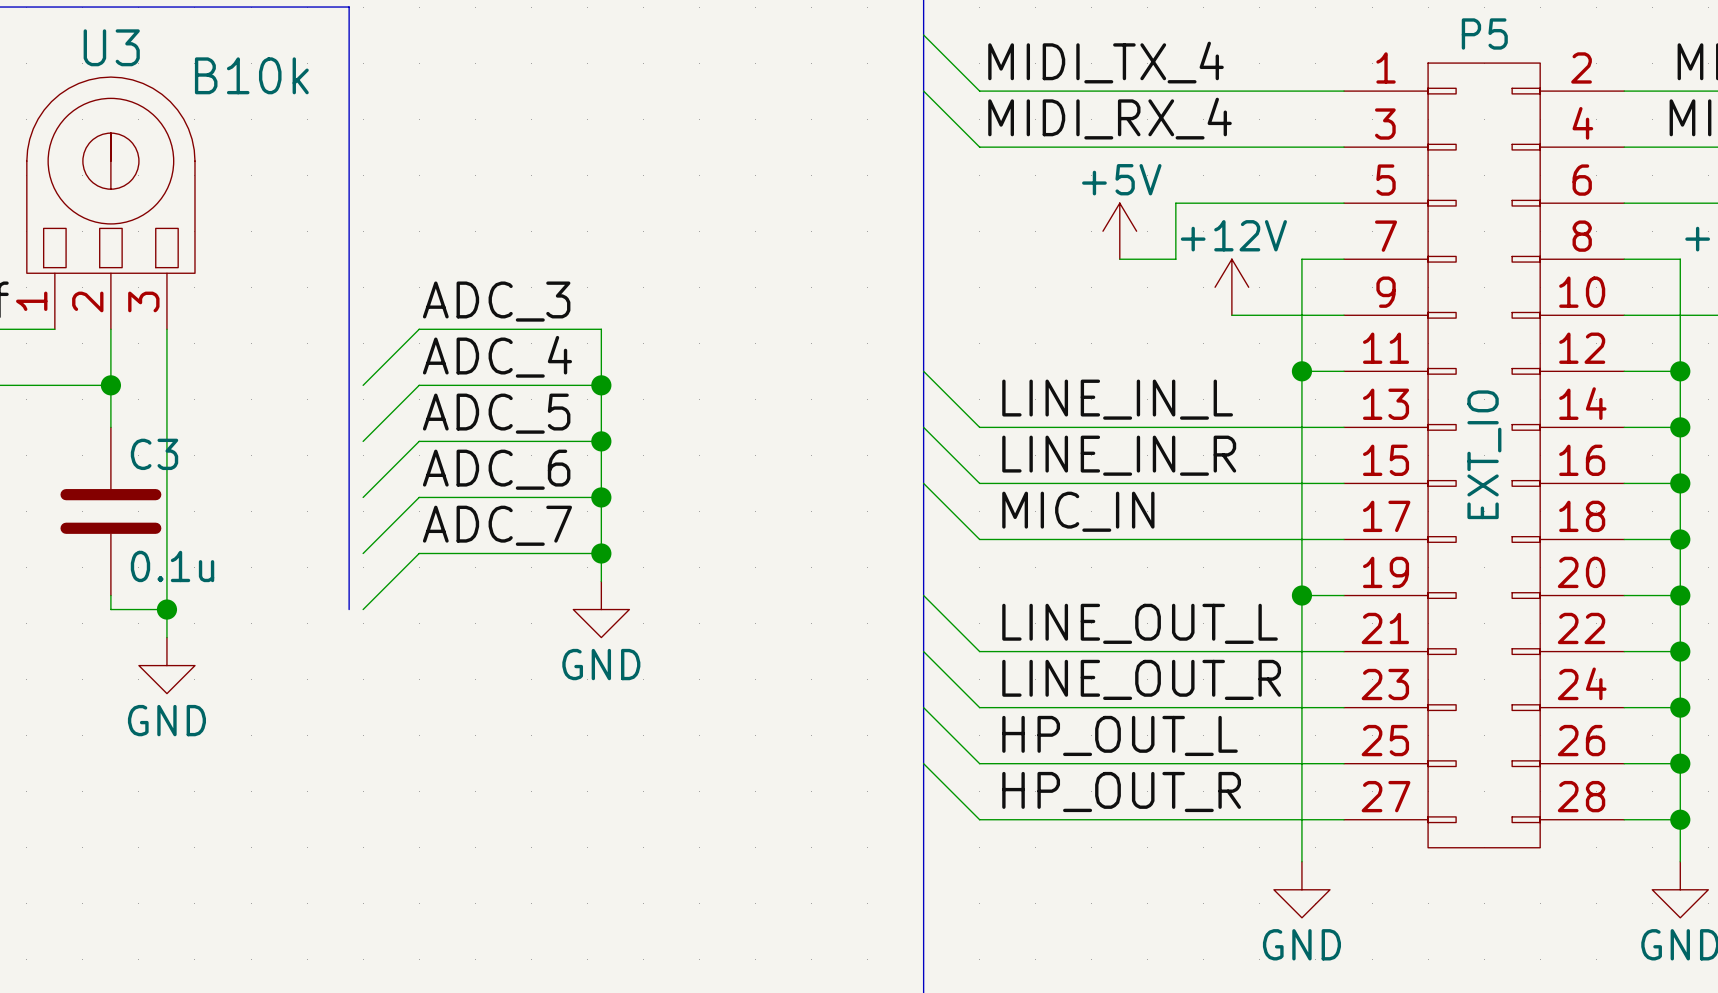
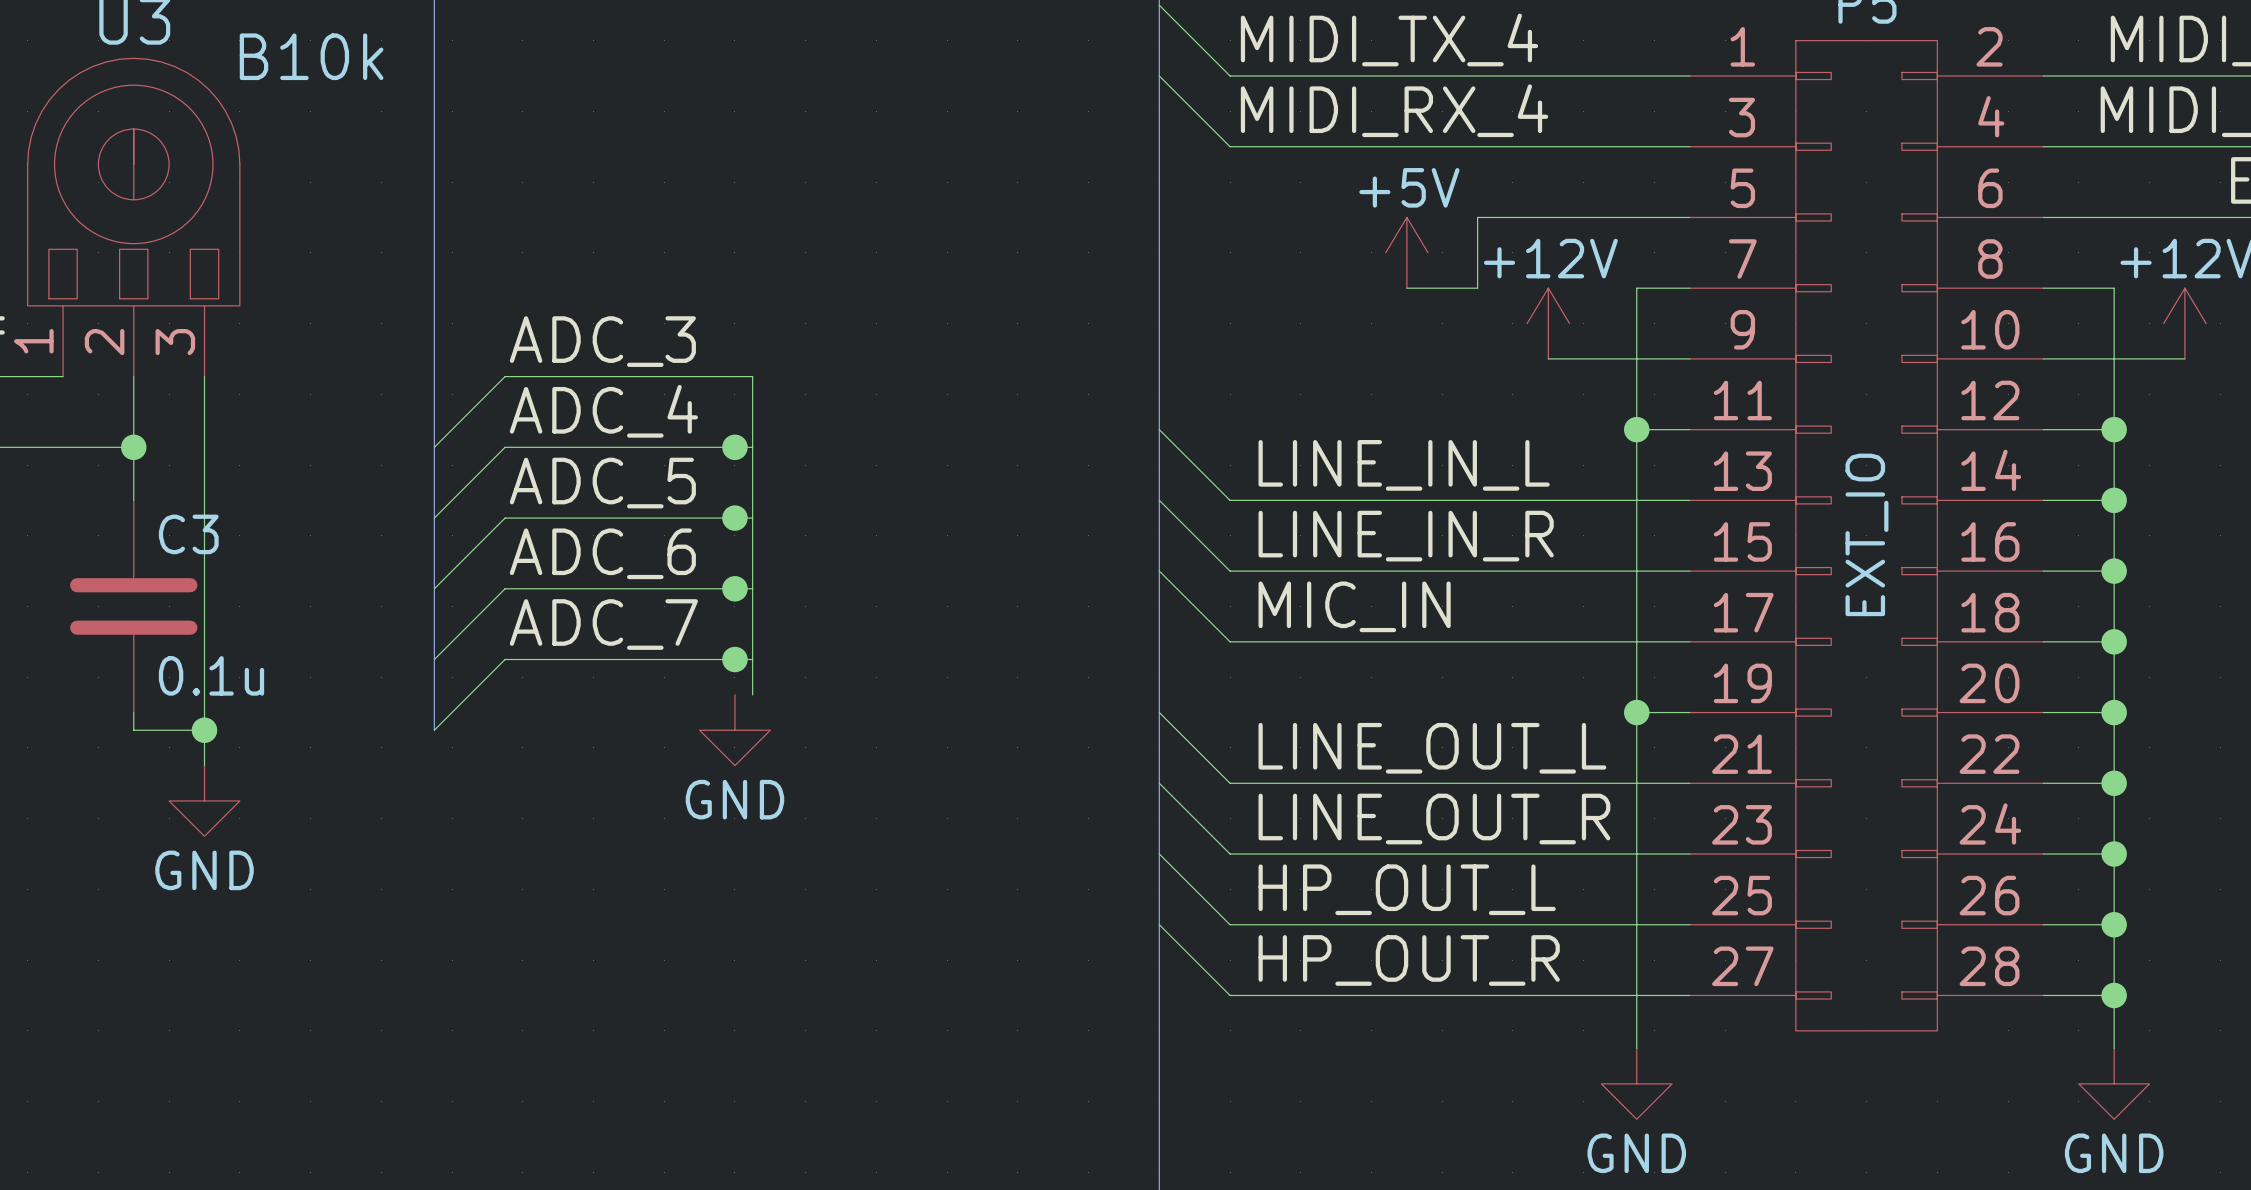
label position: ADC_3 (496, 301) -> ADC_3 (602, 341)
wire: (419, 329) (363, 385) -> (522, 376) (505, 376) (434, 447)
label position: ADC_4 (497, 356) -> ADC_4 (603, 411)
wire: (419, 385) (363, 441) -> (522, 447) (505, 447) (434, 518)
junction position: (601, 385) -> (734, 447)
label position: ADC_5 (496, 413) -> ADC_5 (602, 483)
wire: (419, 441) (363, 497) -> (522, 518) (505, 518) (434, 588)
junction position: (601, 441) -> (734, 518)
label position: ADC_6 (496, 469) -> ADC_6 (602, 553)
wire: (419, 497) (363, 553) -> (522, 588) (505, 588) (434, 659)
junction position: (601, 497) -> (734, 588)
label position: ADC_7 (497, 525) -> ADC_7 (603, 624)
wire: (419, 553) (363, 609) -> (522, 659) (505, 659) (434, 730)
junction position: (601, 553) -> (734, 659)
power symbol position: GND (601, 609) -> GND (734, 730)

